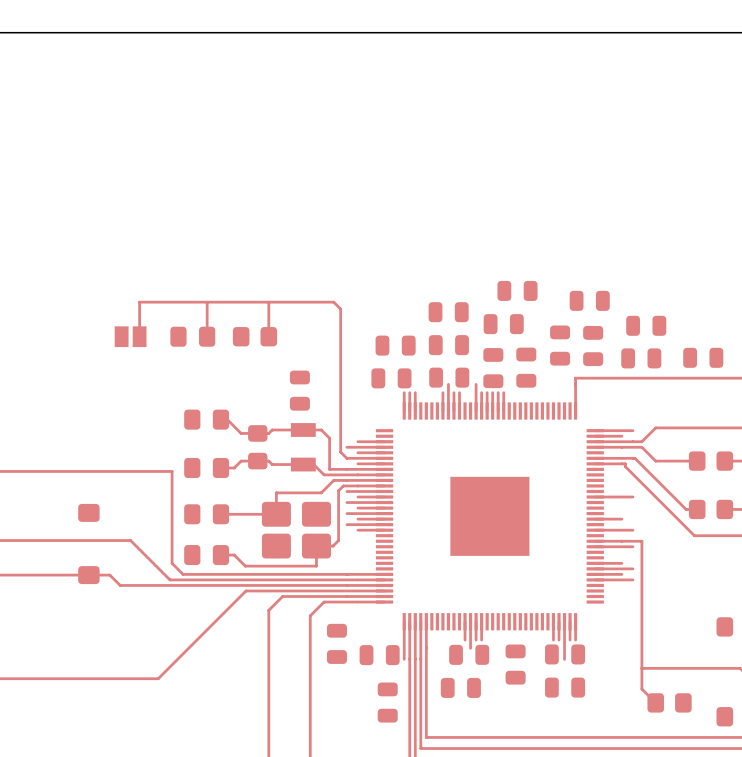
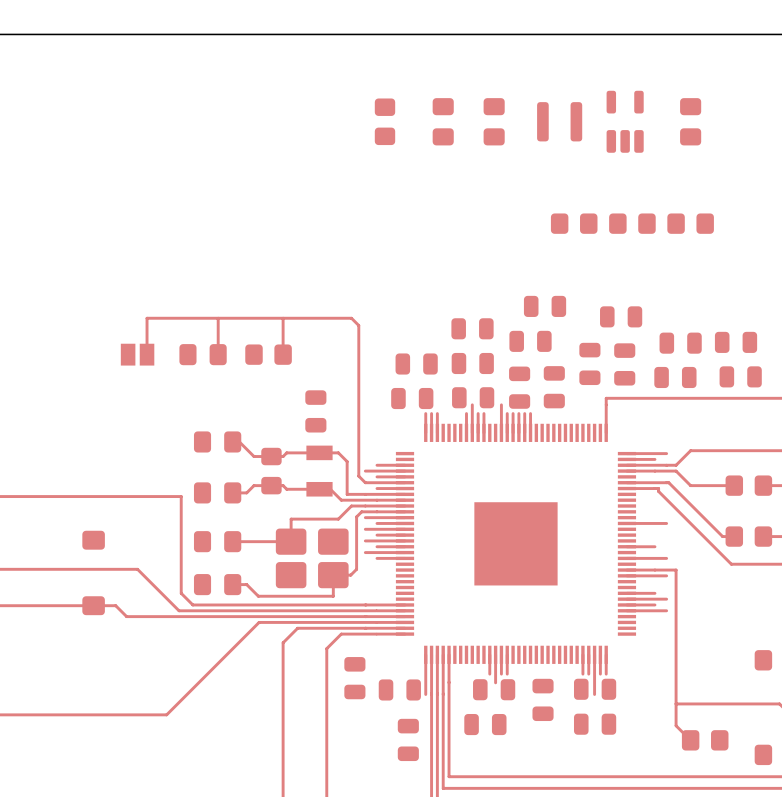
part: none -> (384, 121)
part: none -> (443, 121)
part: none -> (494, 121)
part: none -> (559, 121)
part: none -> (625, 121)
part: none -> (690, 121)
part: none -> (574, 223)
part: none -> (632, 223)
part: none -> (690, 223)
part: none -> (736, 342)

